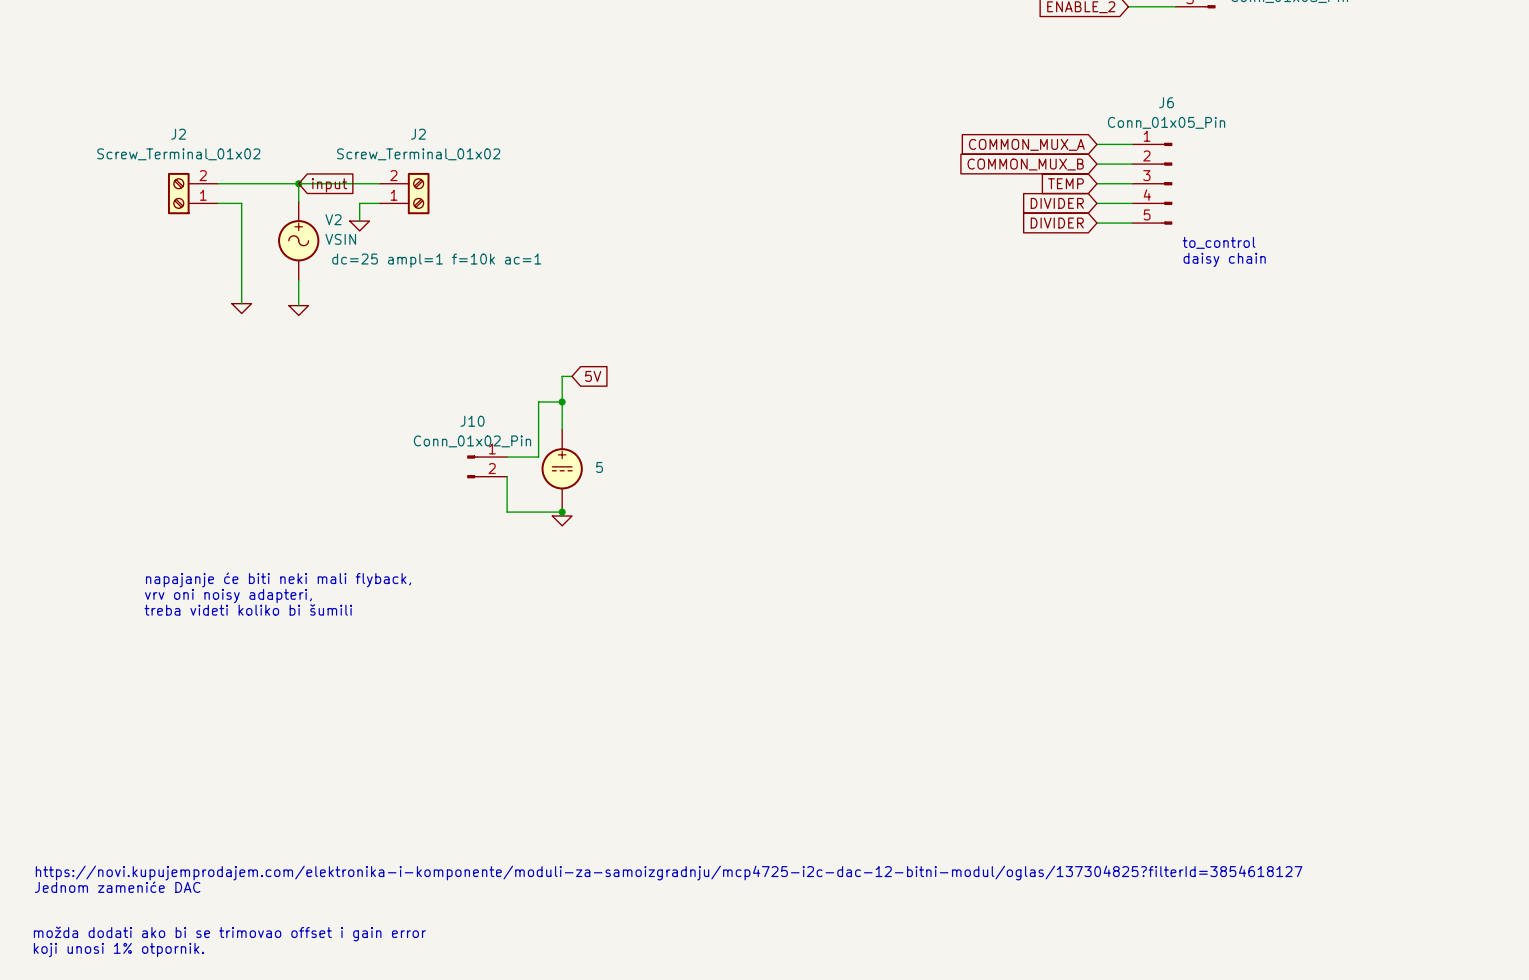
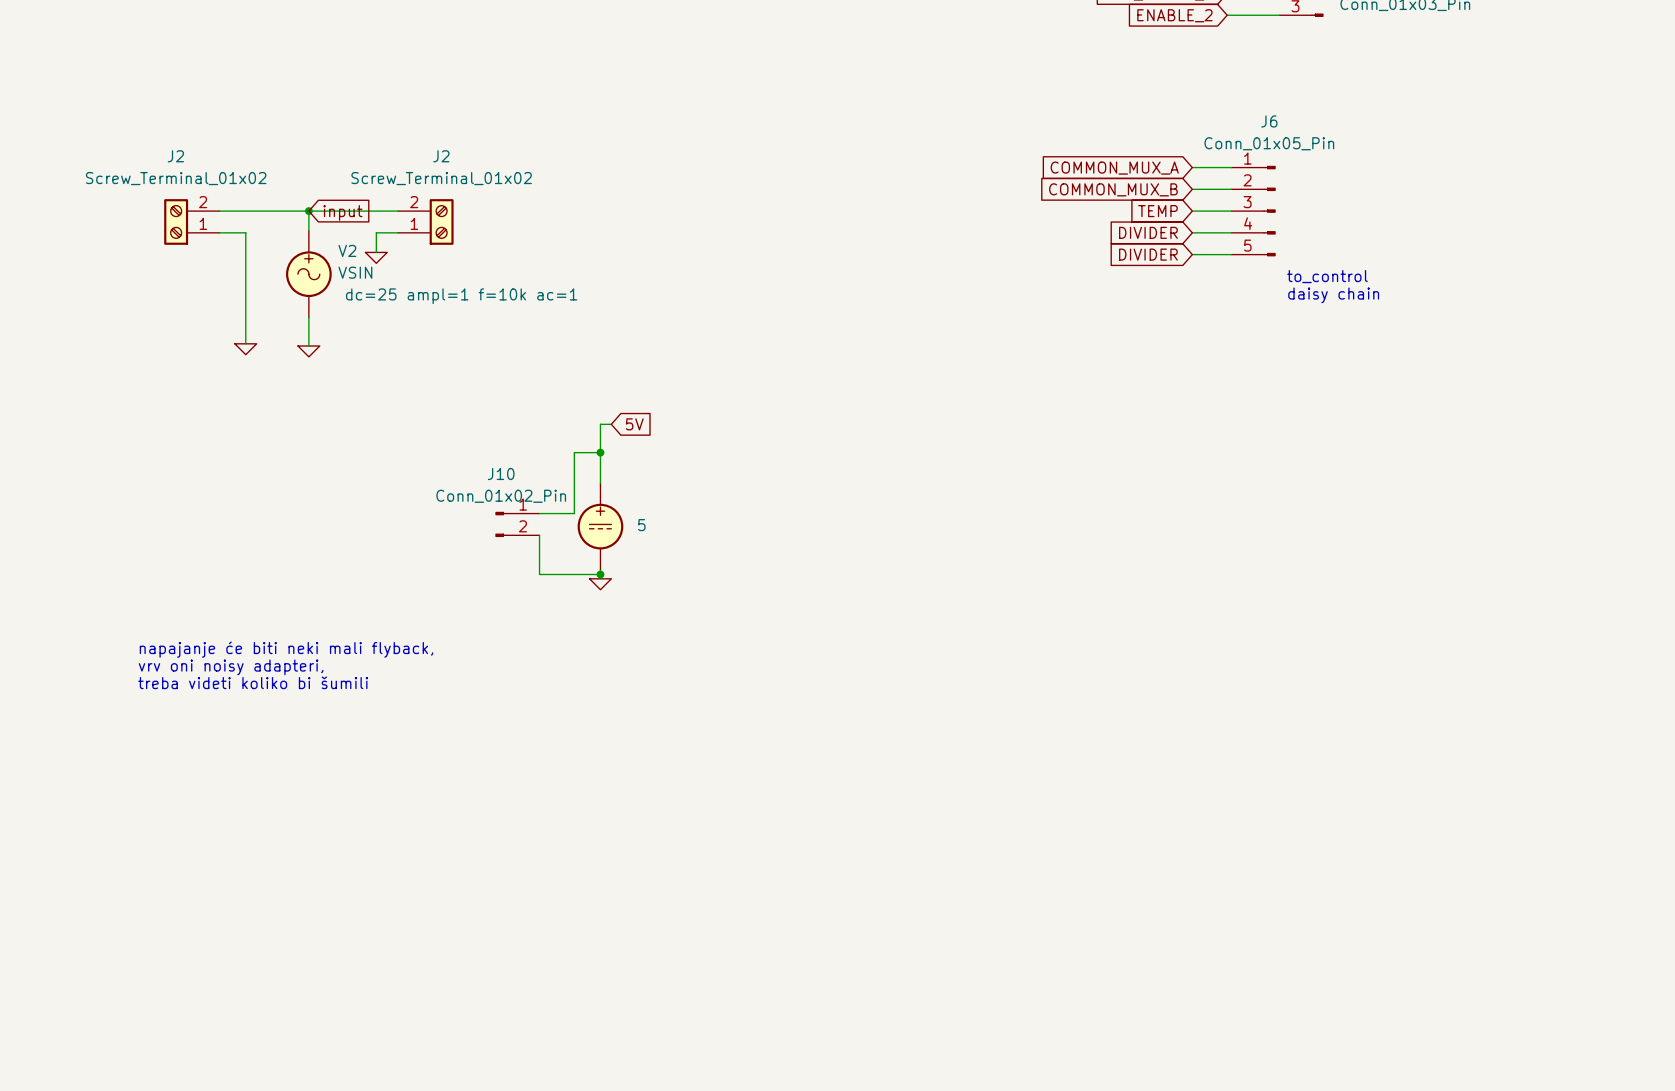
text: https://novi.kupujemprodajem.com/elektronika-i-komponente/moduli-za-samoizgradnju/mcp4725-i2c-dac-12-bitni-modul/oglas/137304825?filterId=3854618127 (669, 873) -> none
text: Jednom zameniće DAC (117, 887) -> none
text: možda dodati ako bi se trimovao offset i gain error (229, 933) -> none
text: koji unosi 1% otpornik. (118, 950) -> none

